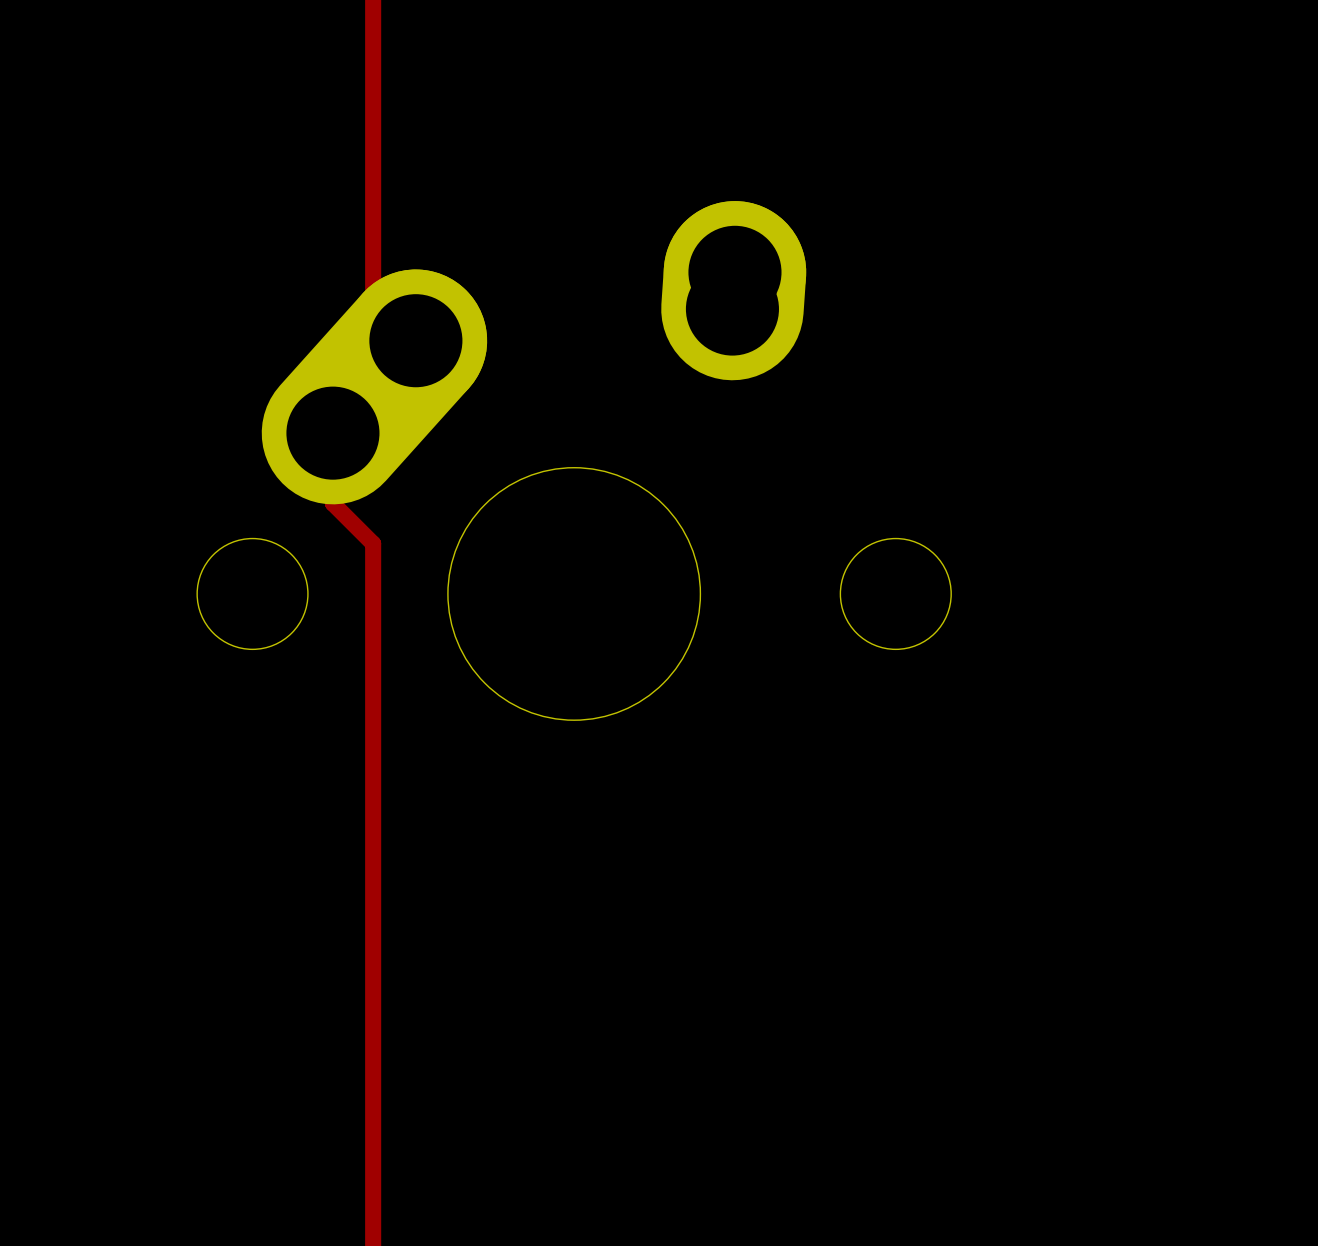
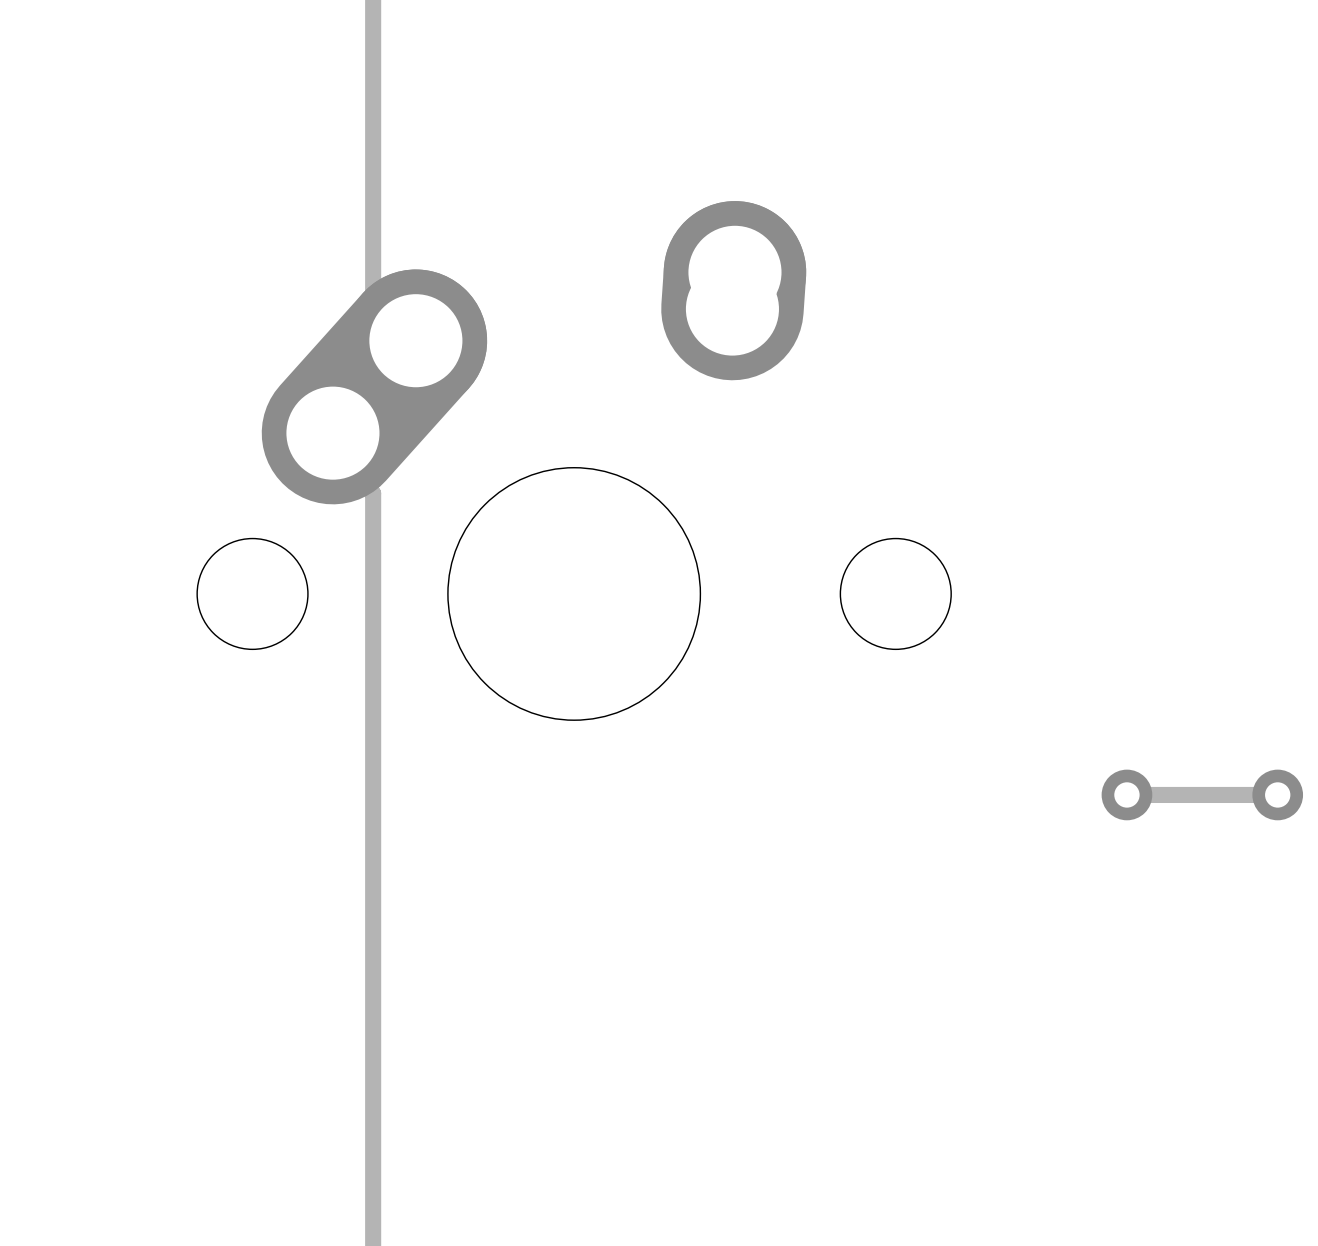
track: (332, 453) (332, 503) (373, 543) -> (332, 453) (373, 493) (373, 543)
track: none -> (1126, 794) (1277, 794)
via: none -> (1126, 794)
via: none -> (1277, 794)

